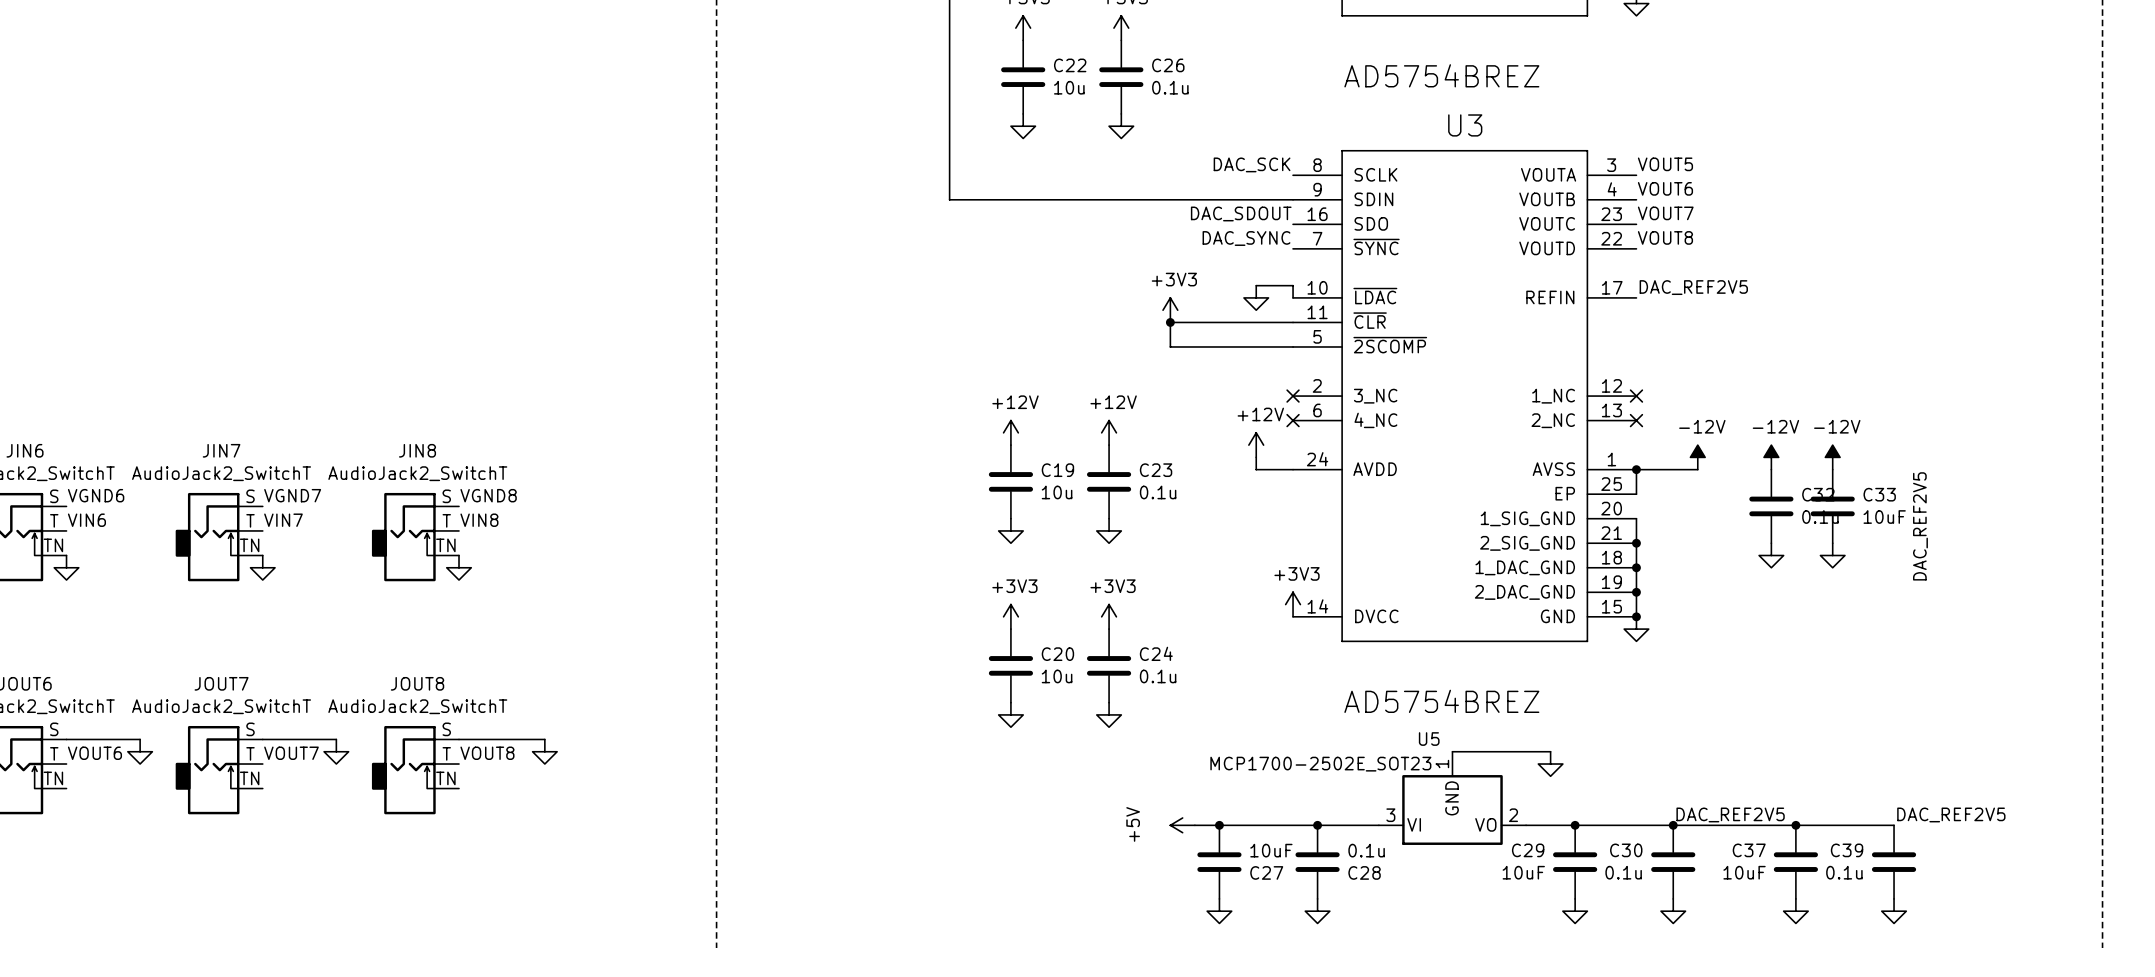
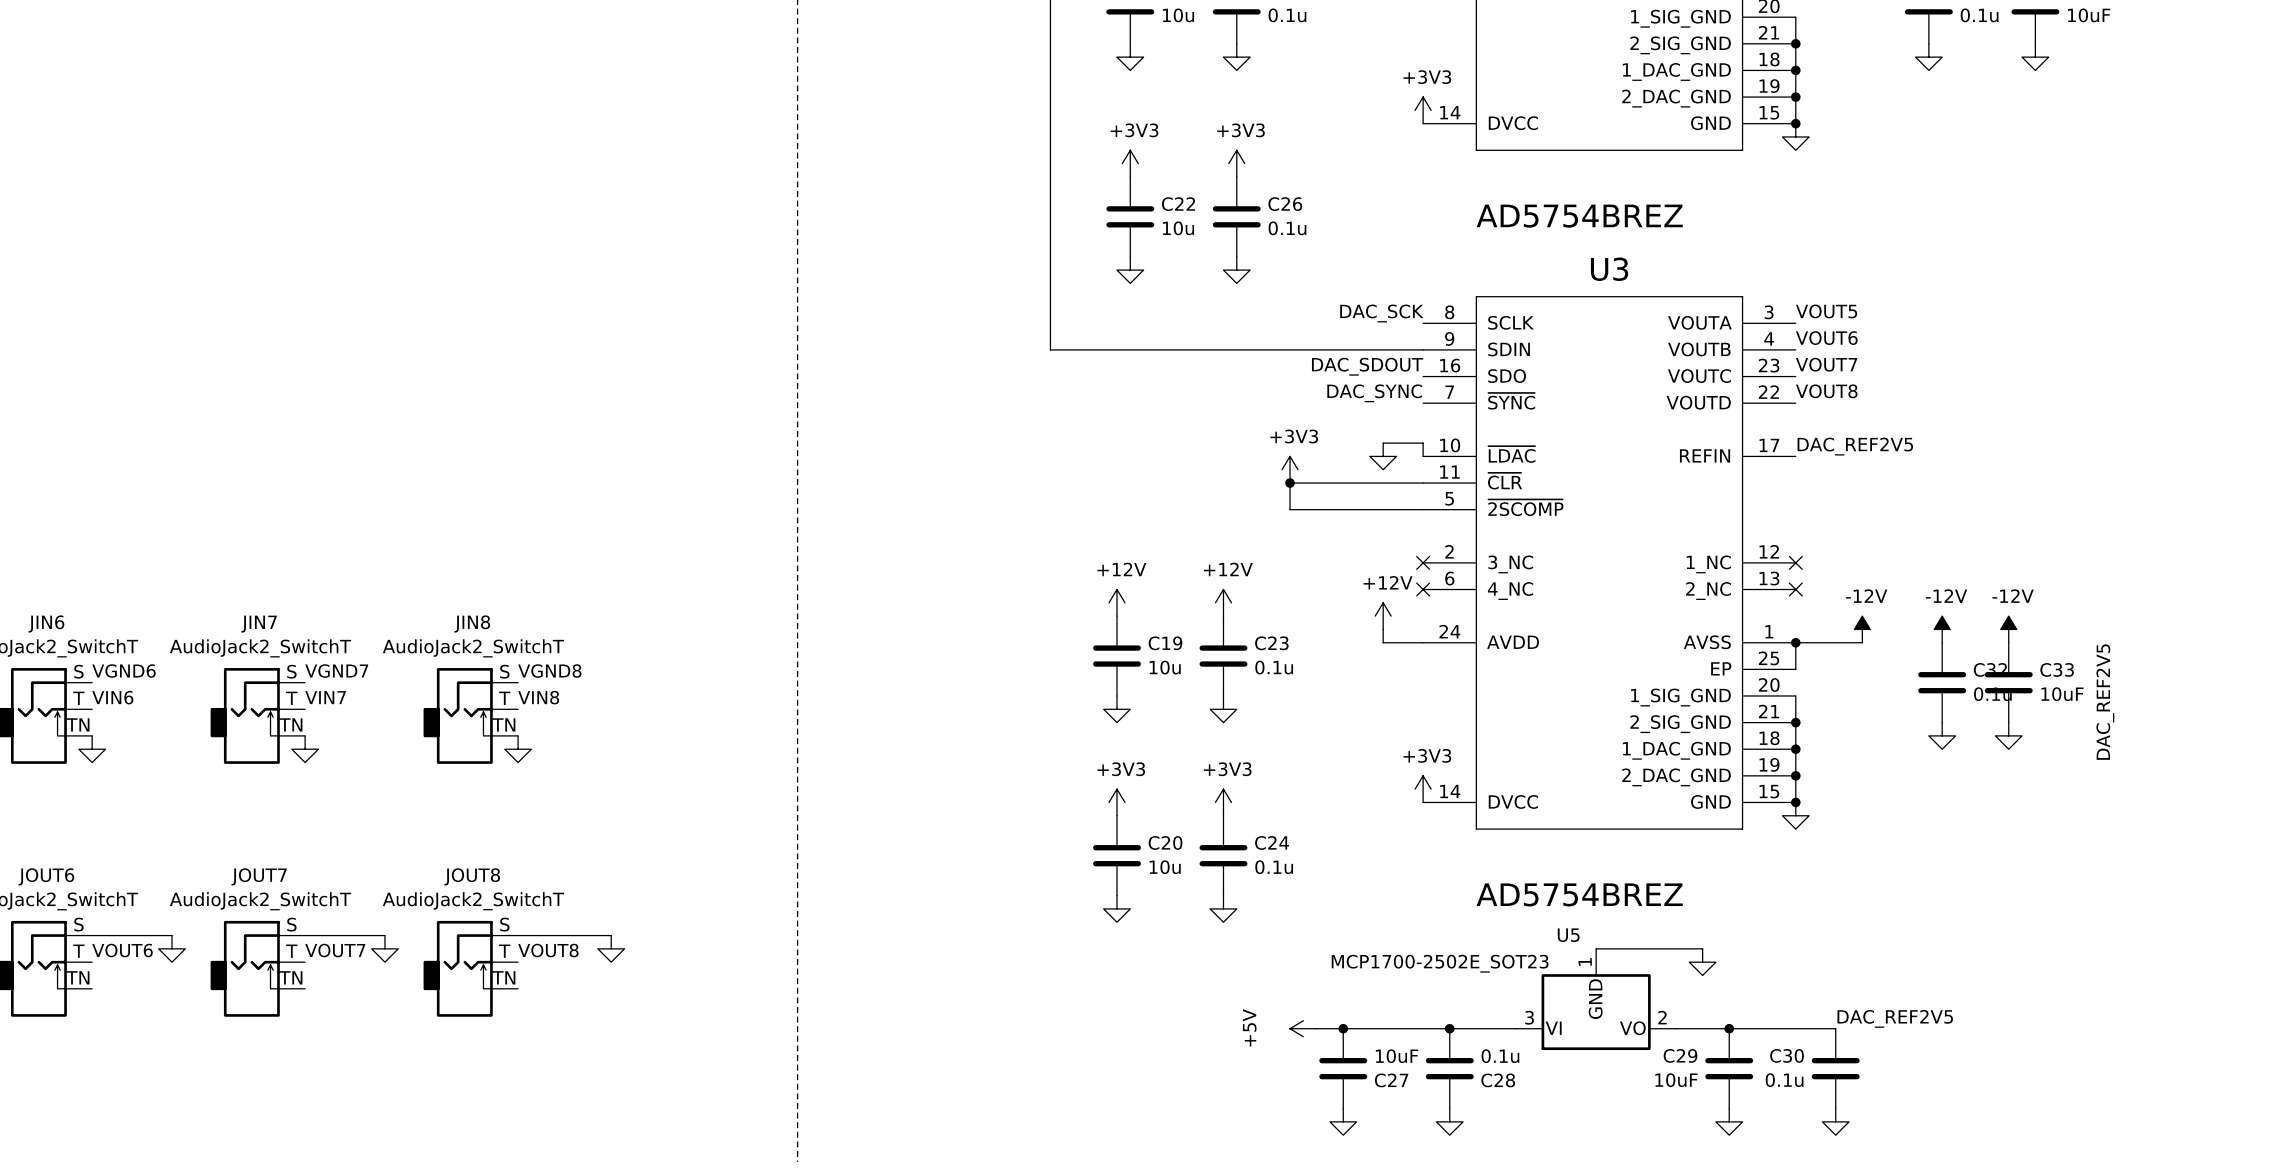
label: DAC_REF2V5 (1951, 814) -> none
wire: (1673, 825) (1894, 825) -> none
junction: (1673, 825) -> none
junction: (1795, 825) -> none
C37: 10uF (1795, 862) -> none
C39: 0.1u (1894, 862) -> none
power symbol: (1795, 911) -> none
power symbol: (1894, 911) -> none

